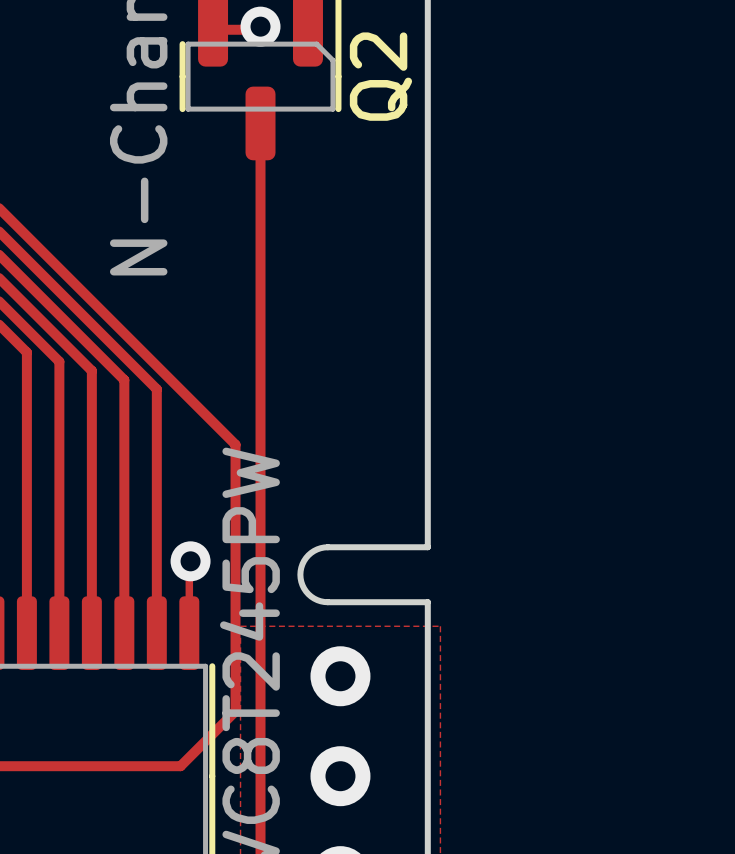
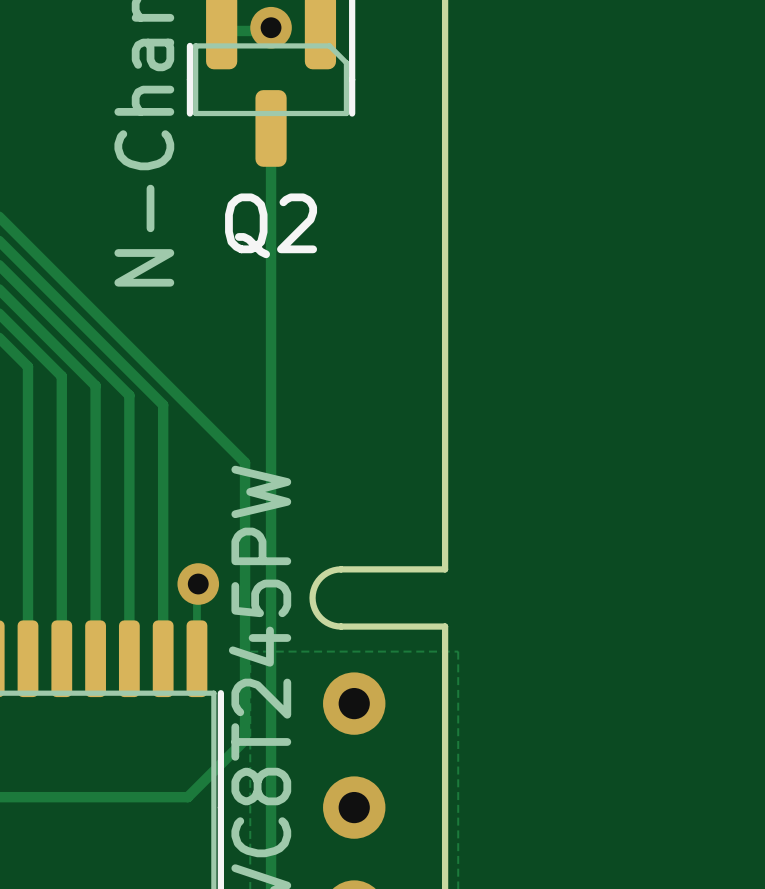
Q2 name rotation: 0° (380, 76) -> 90° clockwise (271, 225)
Q2 name position: Q2 (380, 76) -> Q2 (271, 225)

